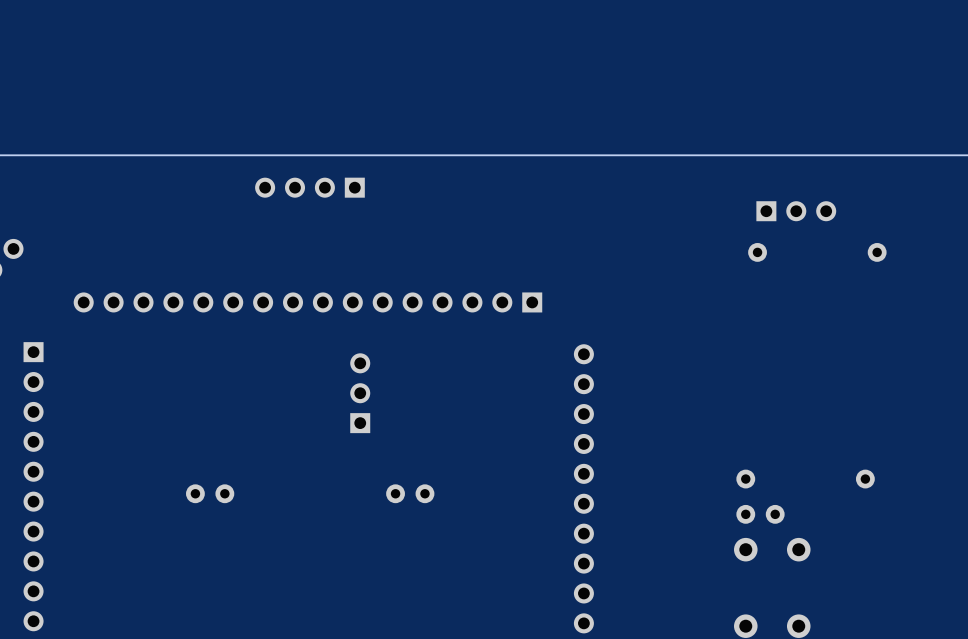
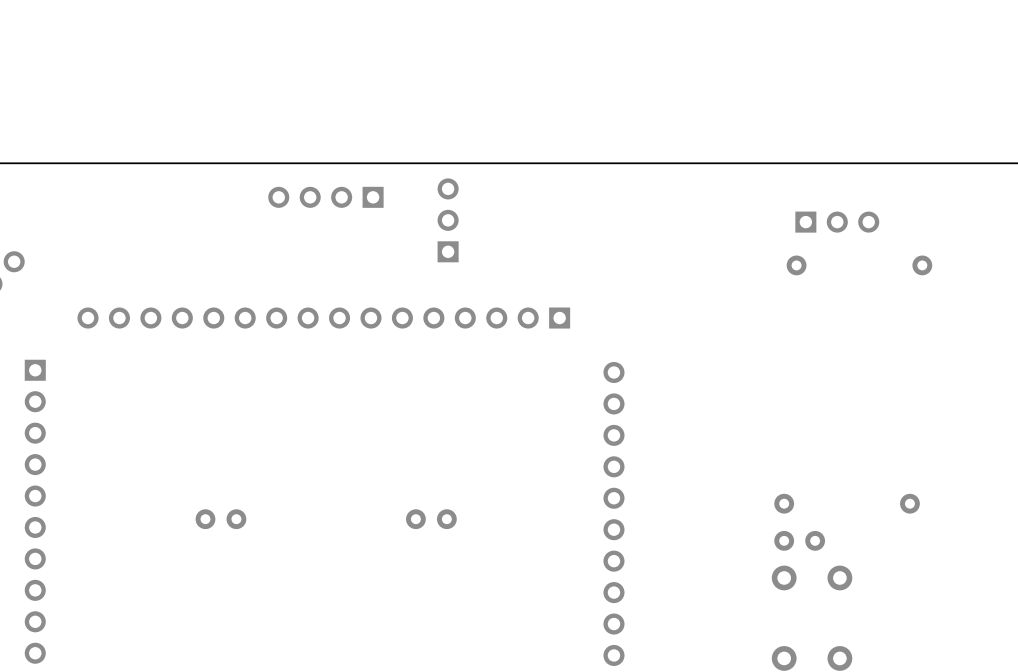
part position: (360, 393) -> (448, 220)

